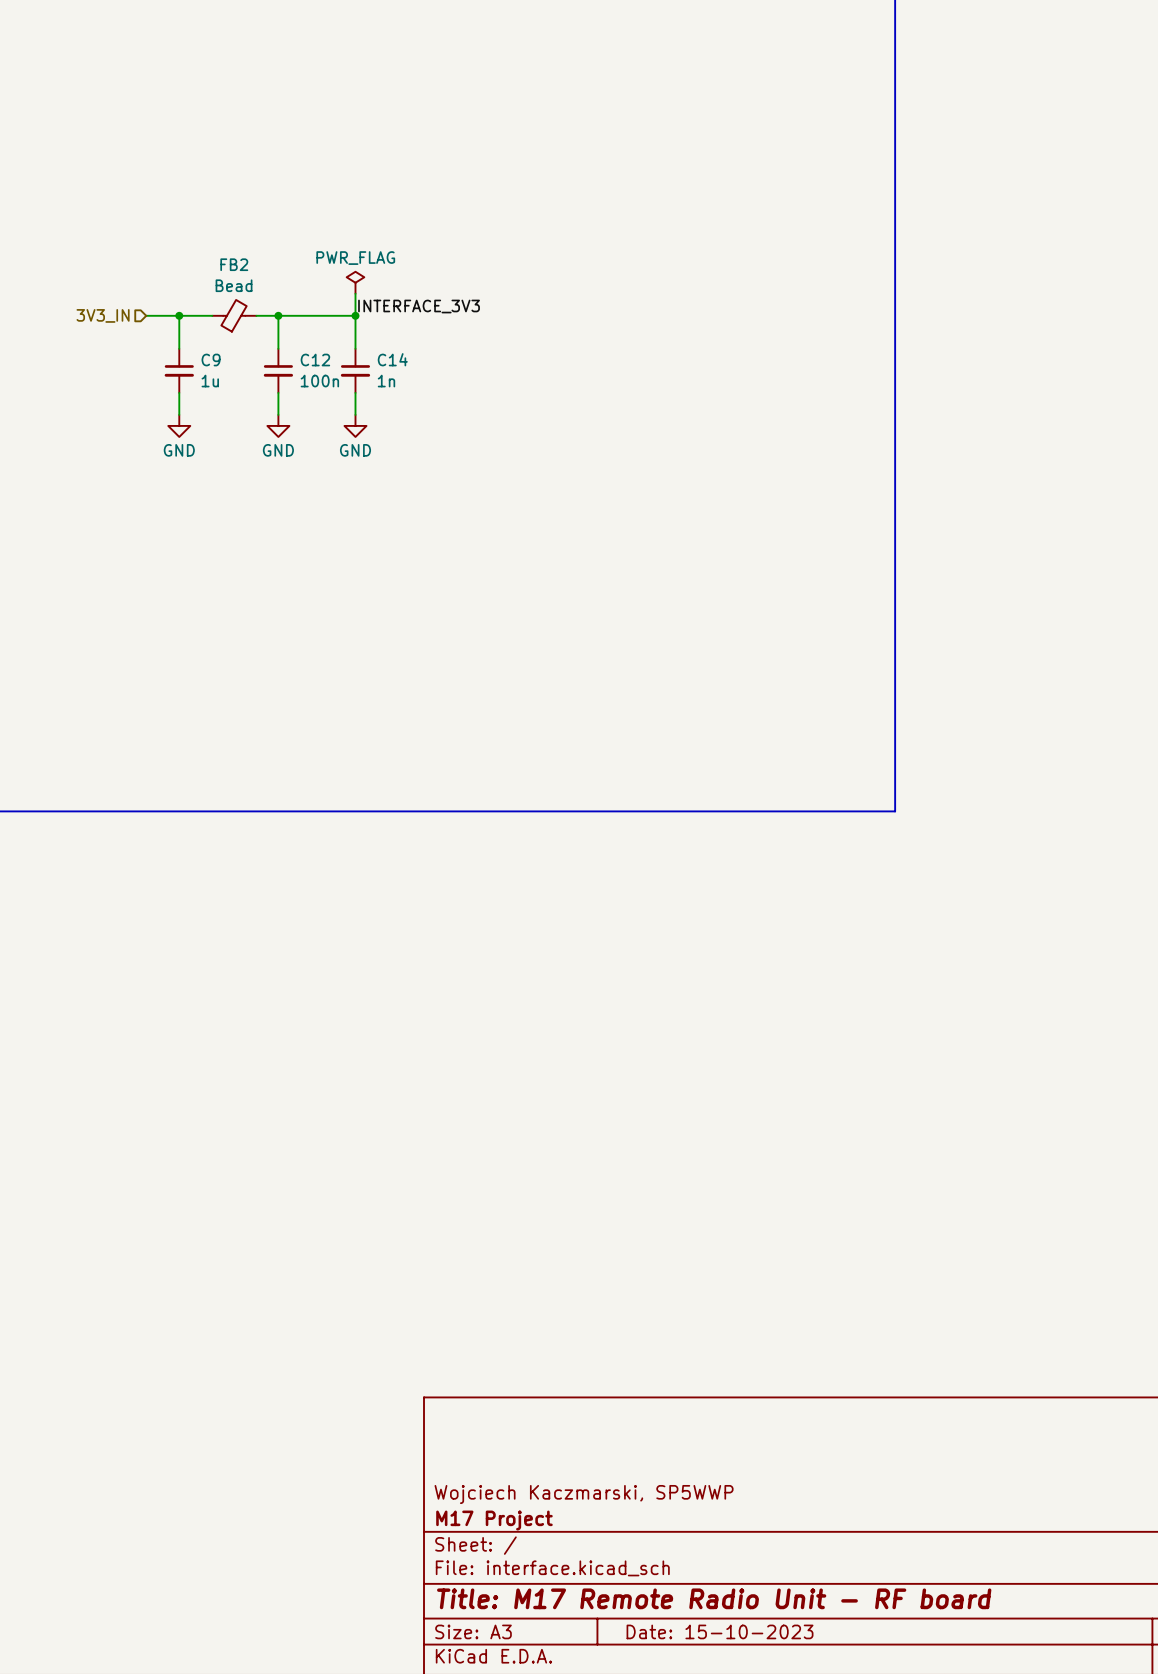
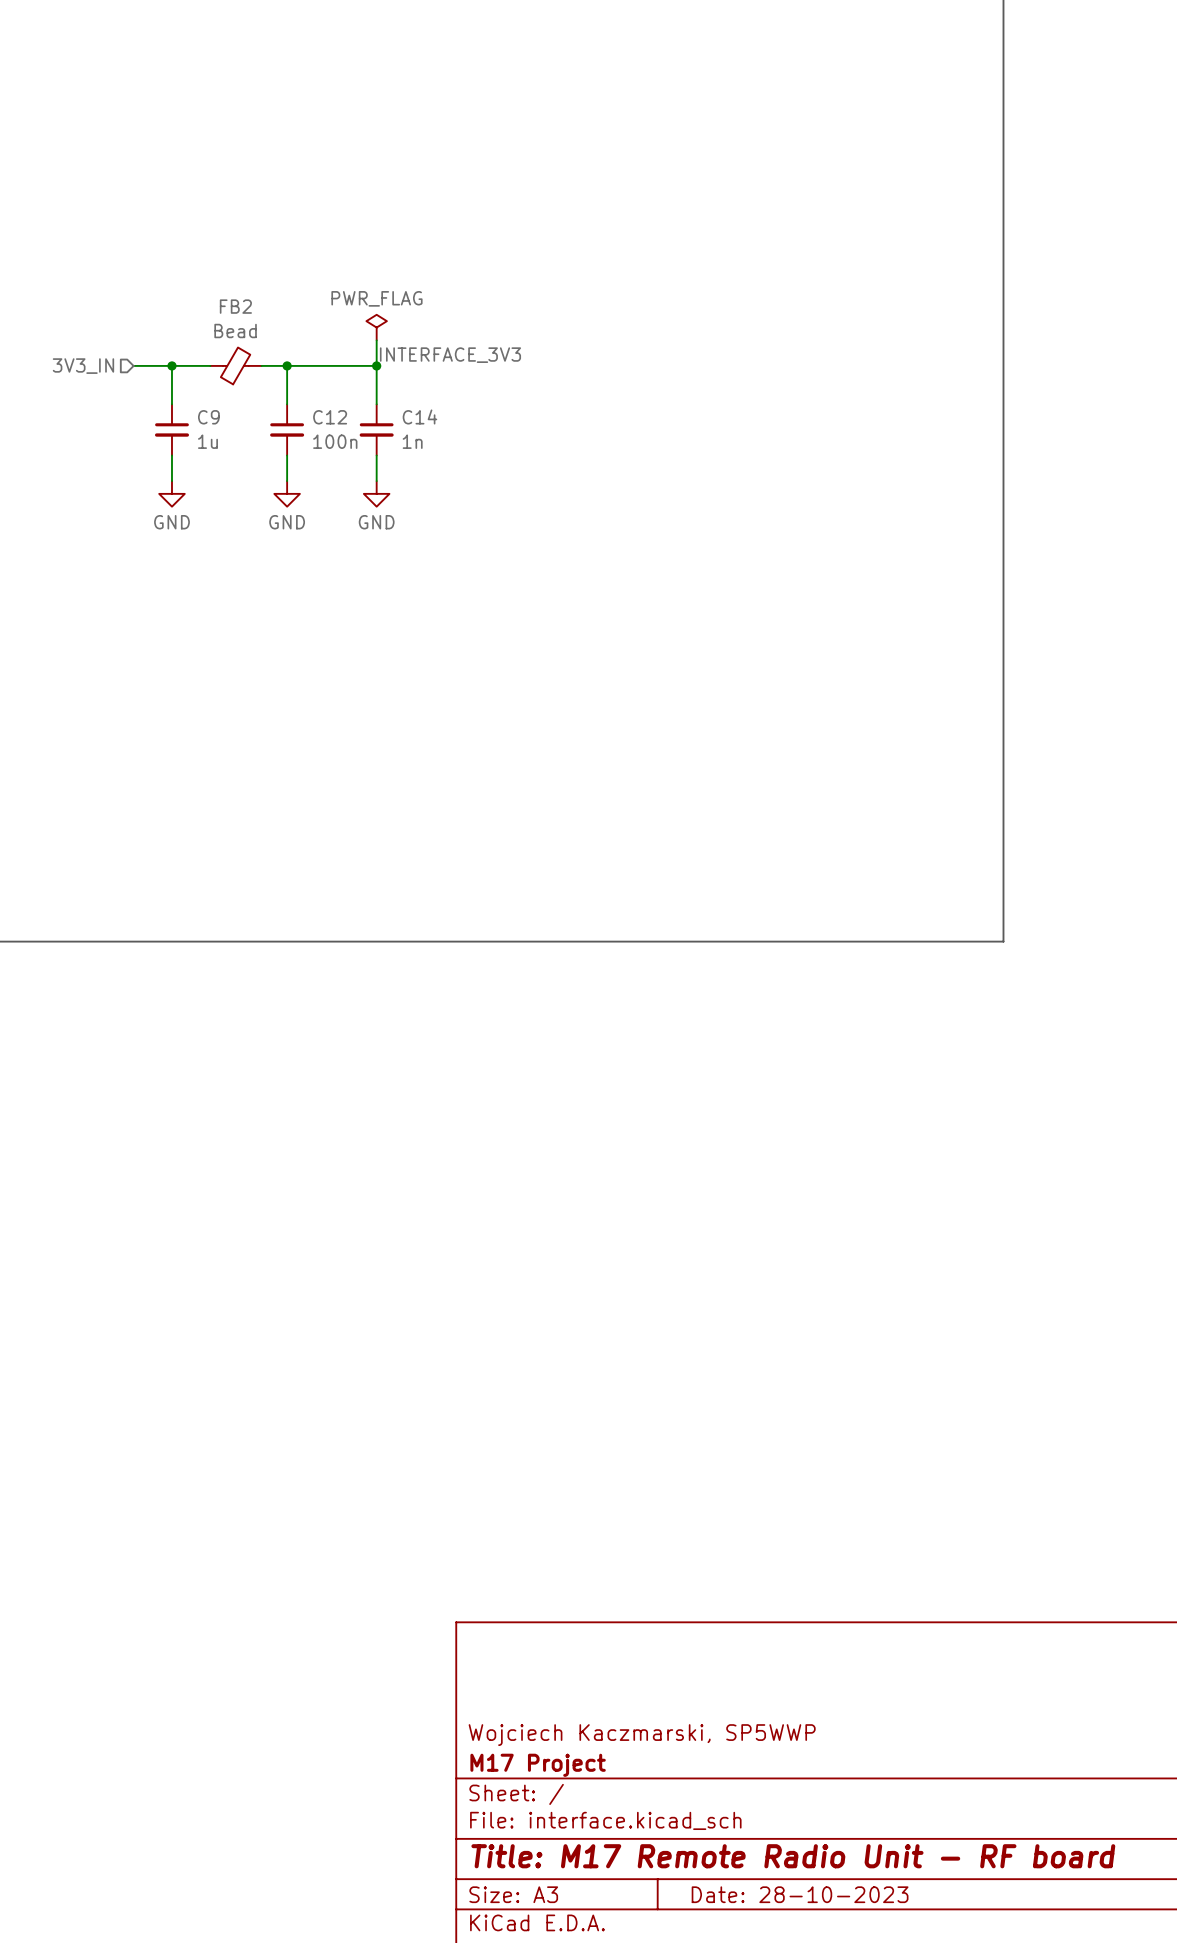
title block: Date: 15-10-2023 (720, 1631) -> Date: 28-10-2023 (800, 1894)

